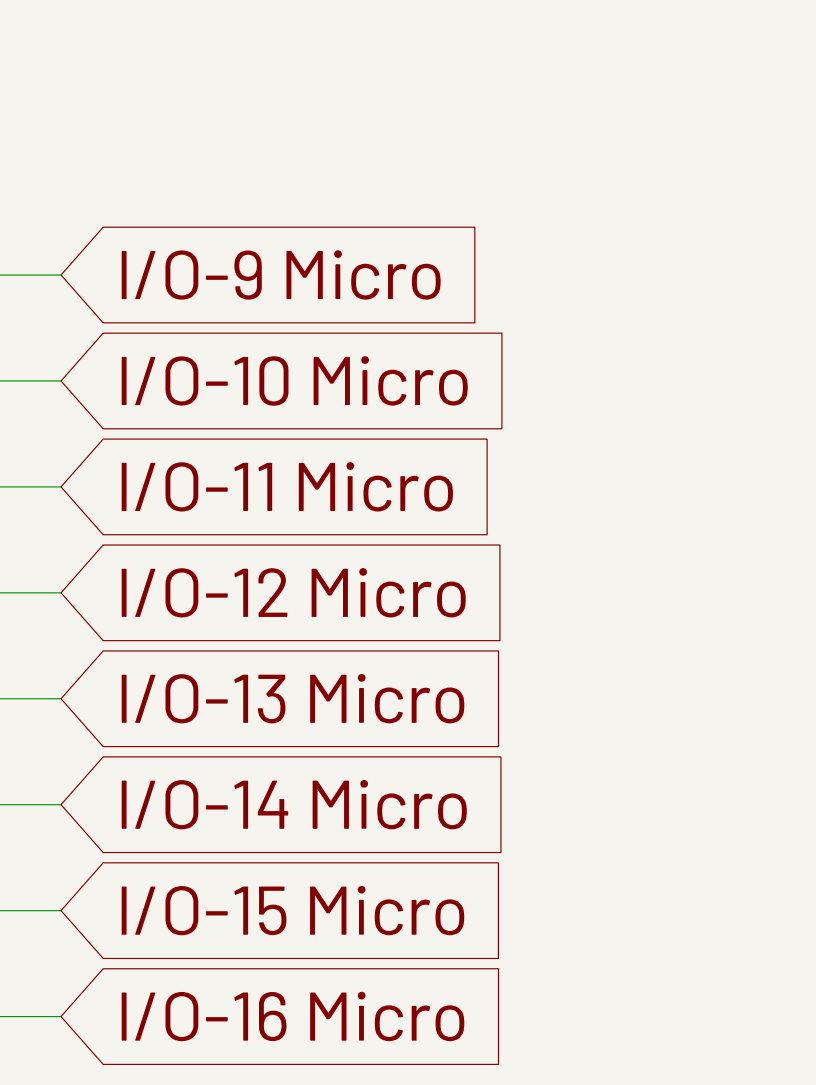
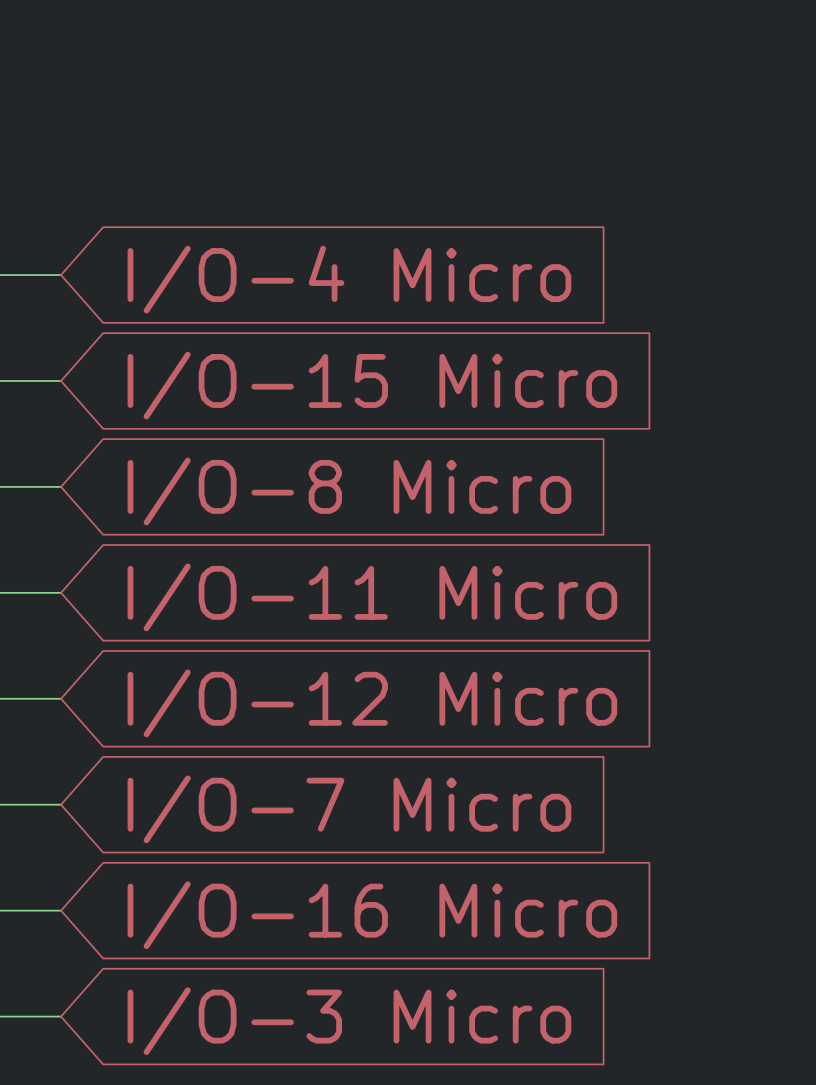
global label: I/O-9 Micro (281, 274) -> I/O-4 Micro (349, 279)
global label: I/O-10 Micro (294, 380) -> I/O-15 Micro (372, 385)
global label: I/O-11 Micro (287, 486) -> I/O-8 Micro (349, 491)
global label: I/O-12 Micro (293, 592) -> I/O-11 Micro (372, 597)
global label: I/O-13 Micro (292, 698) -> I/O-12 Micro (372, 703)
global label: I/O-14 Micro (294, 804) -> I/O-7 Micro (349, 809)
global label: I/O-15 Micro (292, 910) -> I/O-16 Micro (372, 915)
global label: I/O-16 Micro (292, 1016) -> I/O-3 Micro (349, 1021)

